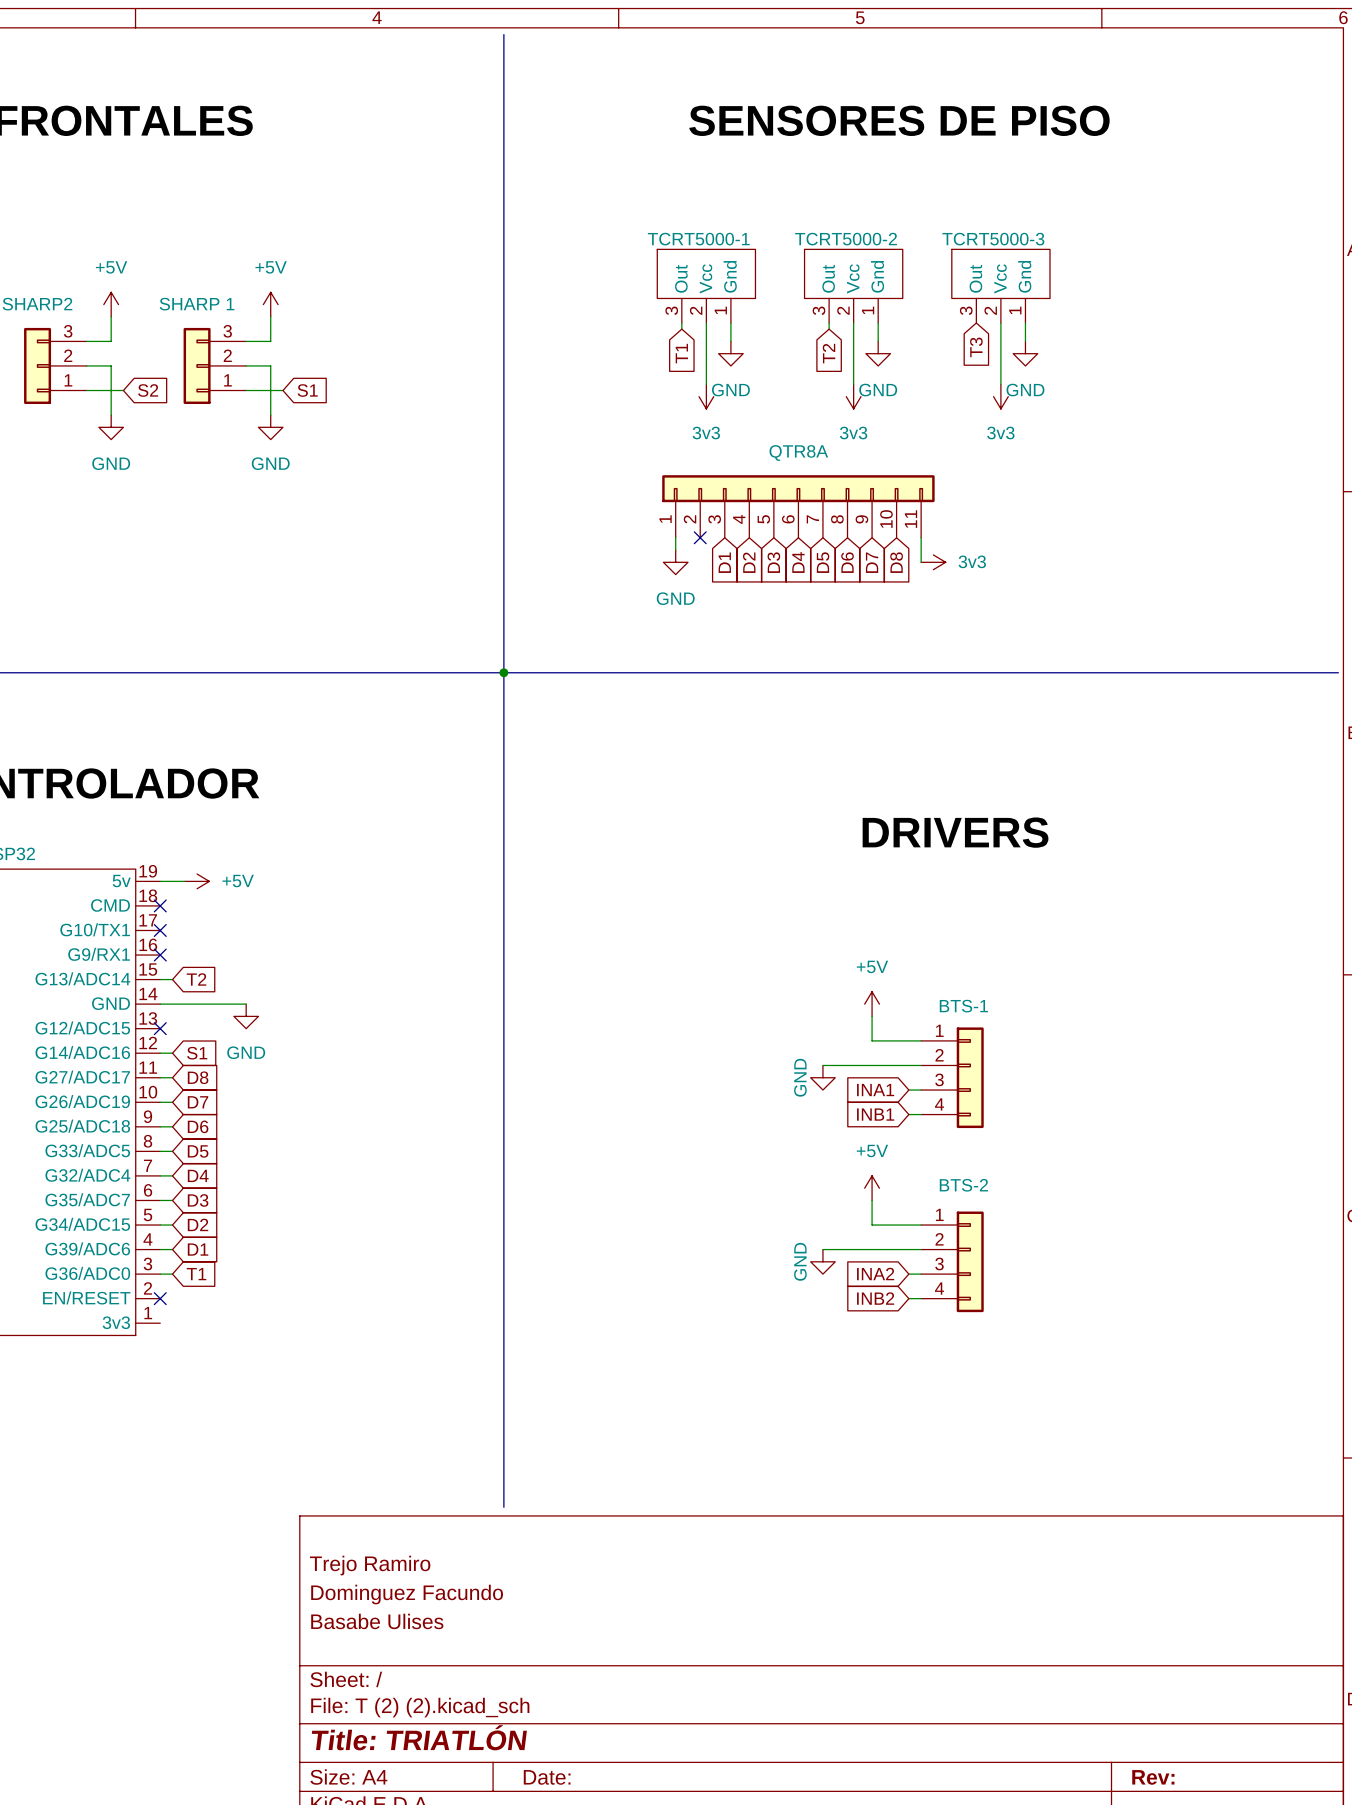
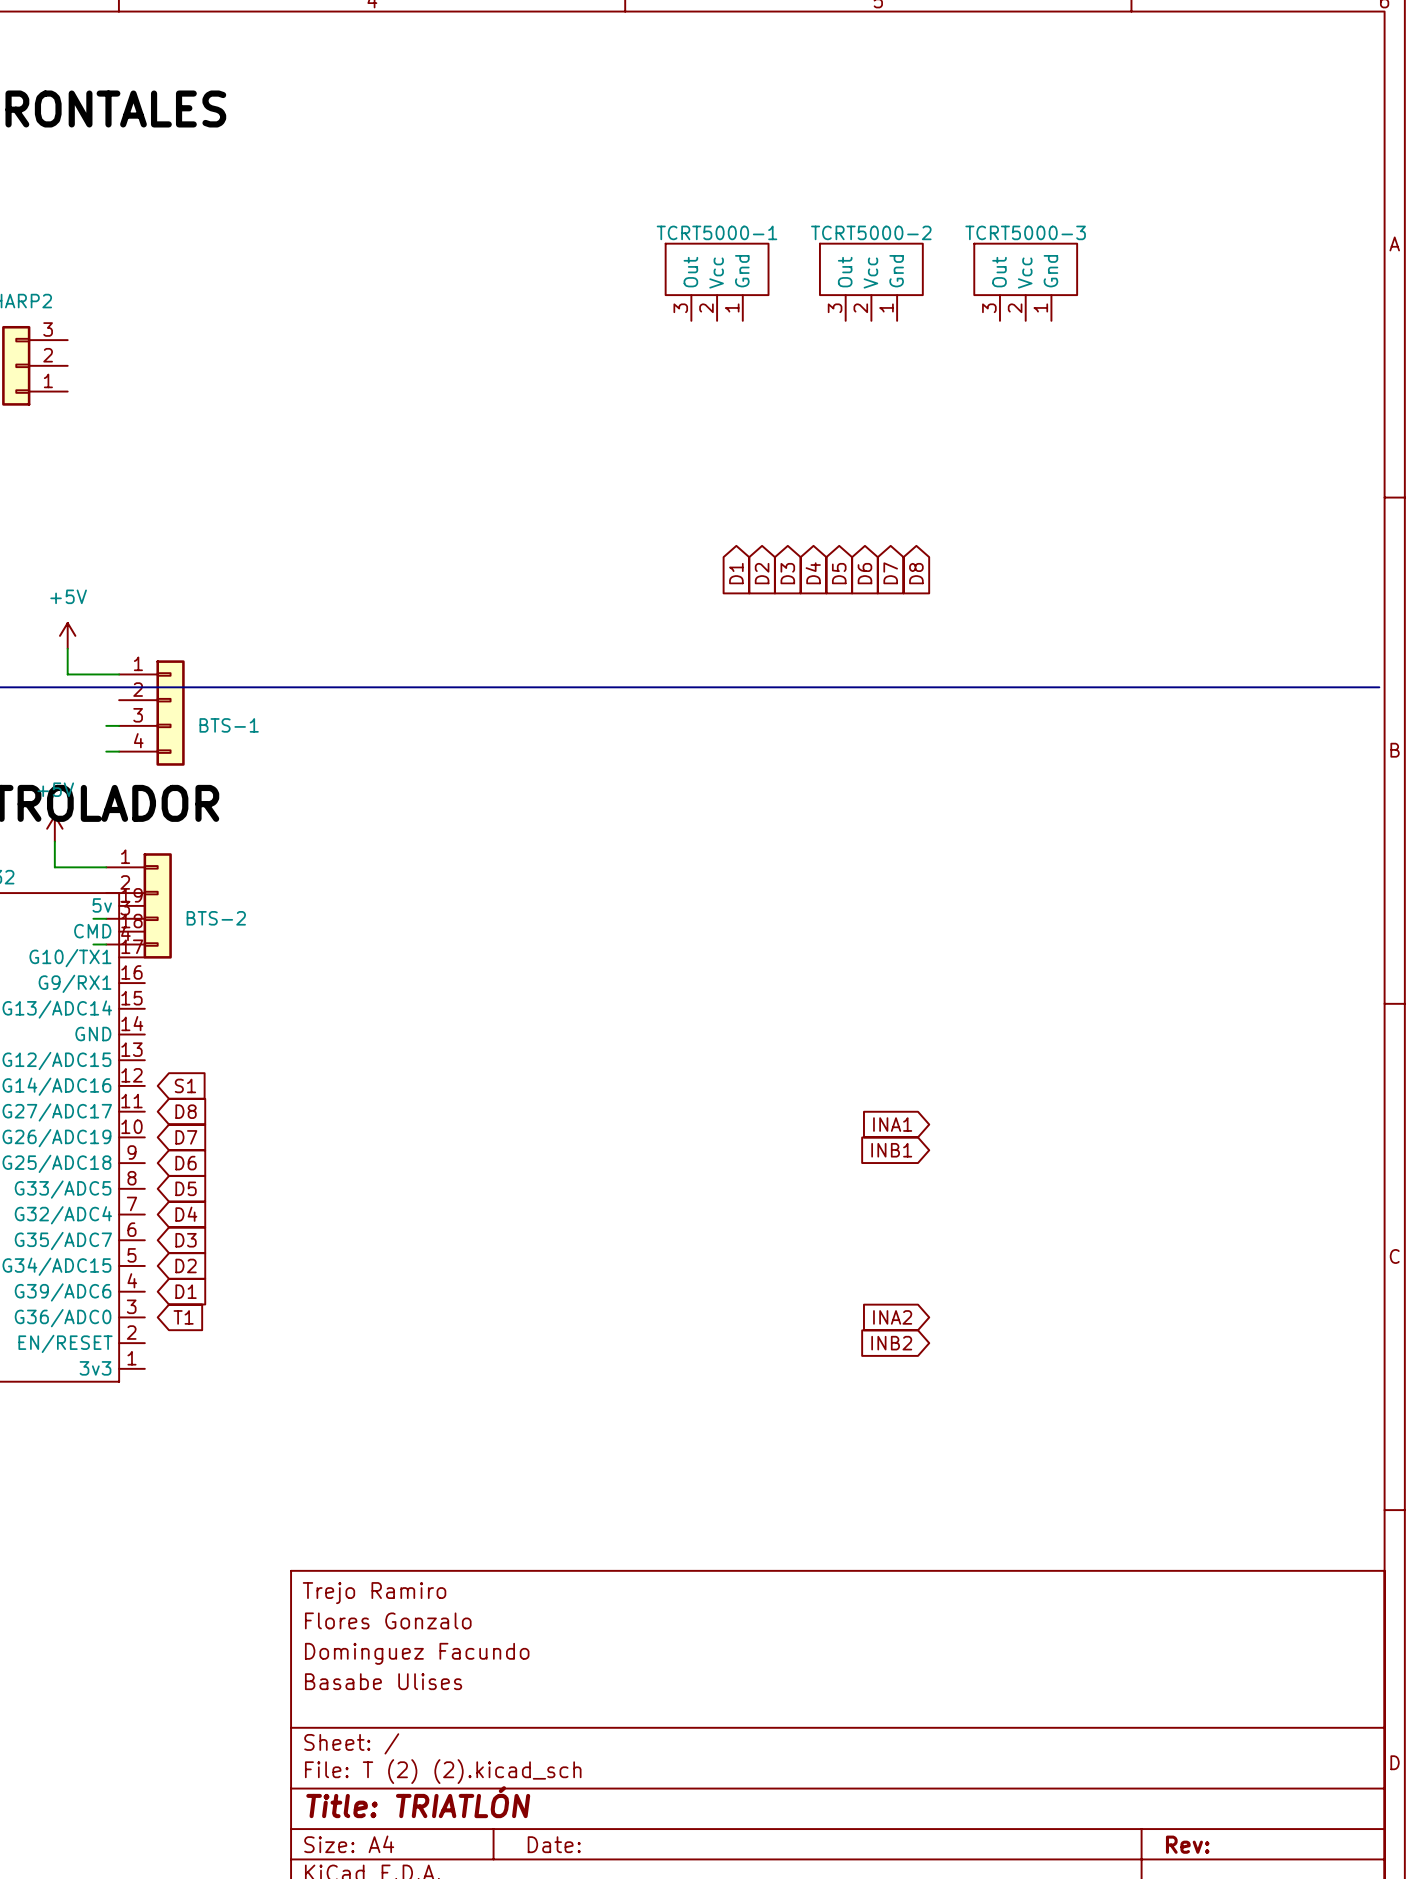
bus: (503, 34) (503, 1507) -> none
label: SENSORES DE PISO (899, 120) -> none
power symbol: +5V (111, 304) -> none
power symbol: +5V (270, 304) -> none
wire: (111, 316) (111, 341) (86, 341) -> none
wire: (270, 316) (270, 341) (246, 341) -> none
wire: (681, 323) (681, 329) -> none
wire: (706, 323) (706, 384) -> none
wire: (730, 323) (730, 341) -> none
wire: (829, 323) (829, 329) -> none
wire: (853, 323) (853, 384) -> none
wire: (878, 323) (878, 341) -> none
wire: (1000, 323) (1000, 384) -> none
wire: (1025, 323) (1025, 341) -> none
global label: T3 (976, 347) -> none
global label: T1 (681, 353) -> none
power symbol: GND (730, 353) -> none
global label: T2 (829, 353) -> none
power symbol: GND (878, 353) -> none
power symbol: GND (1025, 353) -> none
wire: (86, 365) (111, 365) (111, 415) -> none
part: SHARP 1 (214, 365) -> none
wire: (246, 365) (270, 365) (270, 415) -> none
wire: (86, 390) (123, 390) -> none
global label: S2 (148, 390) -> none
wire: (246, 390) (282, 390) -> none
global label: S1 (307, 390) -> none
power symbol: 3v3 (706, 396) -> none
power symbol: 3v3 (853, 396) -> none
power symbol: 3v3 (1000, 396) -> none
power symbol: GND (111, 427) -> none
power symbol: GND (270, 427) -> none
part: QTR8A (798, 506) -> none
wire: (675, 537) (675, 550) -> none
no-connect mark: (700, 537) -> none
wire: (921, 537) (921, 562) -> none
power symbol: GND (675, 562) -> none
power symbol: 3v3 (933, 562) -> none
power symbol: none -> +5V (67, 635)
wire: none -> (67, 648) (67, 674) (119, 674)
junction: (503, 672) -> none
part: none -> BTS-1 (151, 713)
wire: none -> (106, 725) (119, 725)
wire: none -> (106, 751) (119, 751)
power symbol: none -> +5V (54, 828)
wire: none -> (54, 841) (54, 867) (106, 867)
label: DRIVERS (955, 832) -> none
part: none -> BTS-2 (139, 905)
power symbol: +5V (197, 881) -> none
no-connect mark: (160, 905) -> none
no-connect mark: (160, 930) -> none
no-connect mark: (160, 955) -> none
wire: (160, 979) (172, 979) -> none
global label: T2 (196, 979) -> none
wire: (160, 1004) (246, 1004) -> none
power symbol: +5V (872, 1004) -> none
power symbol: GND (246, 1016) -> none
wire: (872, 1016) (872, 1040) (921, 1040) -> none
no-connect mark: (160, 1028) -> none
wire: (160, 1053) (172, 1053) -> (93, 918) (106, 918)
wire: (822, 1065) (921, 1065) -> none
wire: (160, 1077) (172, 1077) -> (93, 944) (106, 944)
power symbol: GND (822, 1077) -> none
part: BTS-1 (952, 1077) -> none
wire: (908, 1090) (921, 1090) -> none
wire: (160, 1102) (172, 1102) -> none
wire: (908, 1114) (921, 1114) -> none
wire: (160, 1126) (172, 1126) -> none
wire: (160, 1151) (172, 1151) -> none
wire: (160, 1175) (172, 1175) -> none
power symbol: +5V (872, 1188) -> none
wire: (160, 1200) (172, 1200) -> none
wire: (872, 1200) (872, 1225) (921, 1225) -> none
wire: (160, 1225) (172, 1225) -> none
wire: (160, 1249) (172, 1249) -> none
wire: (822, 1249) (921, 1249) -> none
power symbol: GND (822, 1261) -> none
part: BTS-2 (952, 1261) -> none
wire: (160, 1274) (172, 1274) -> none
wire: (908, 1274) (921, 1274) -> none
no-connect mark: (160, 1298) -> none
wire: (908, 1298) (921, 1298) -> none
title block: none -> Trejo Ramiro (374, 1593)
title block: Trejo Ramiro (370, 1565) -> Flores Gonzalo (388, 1620)

